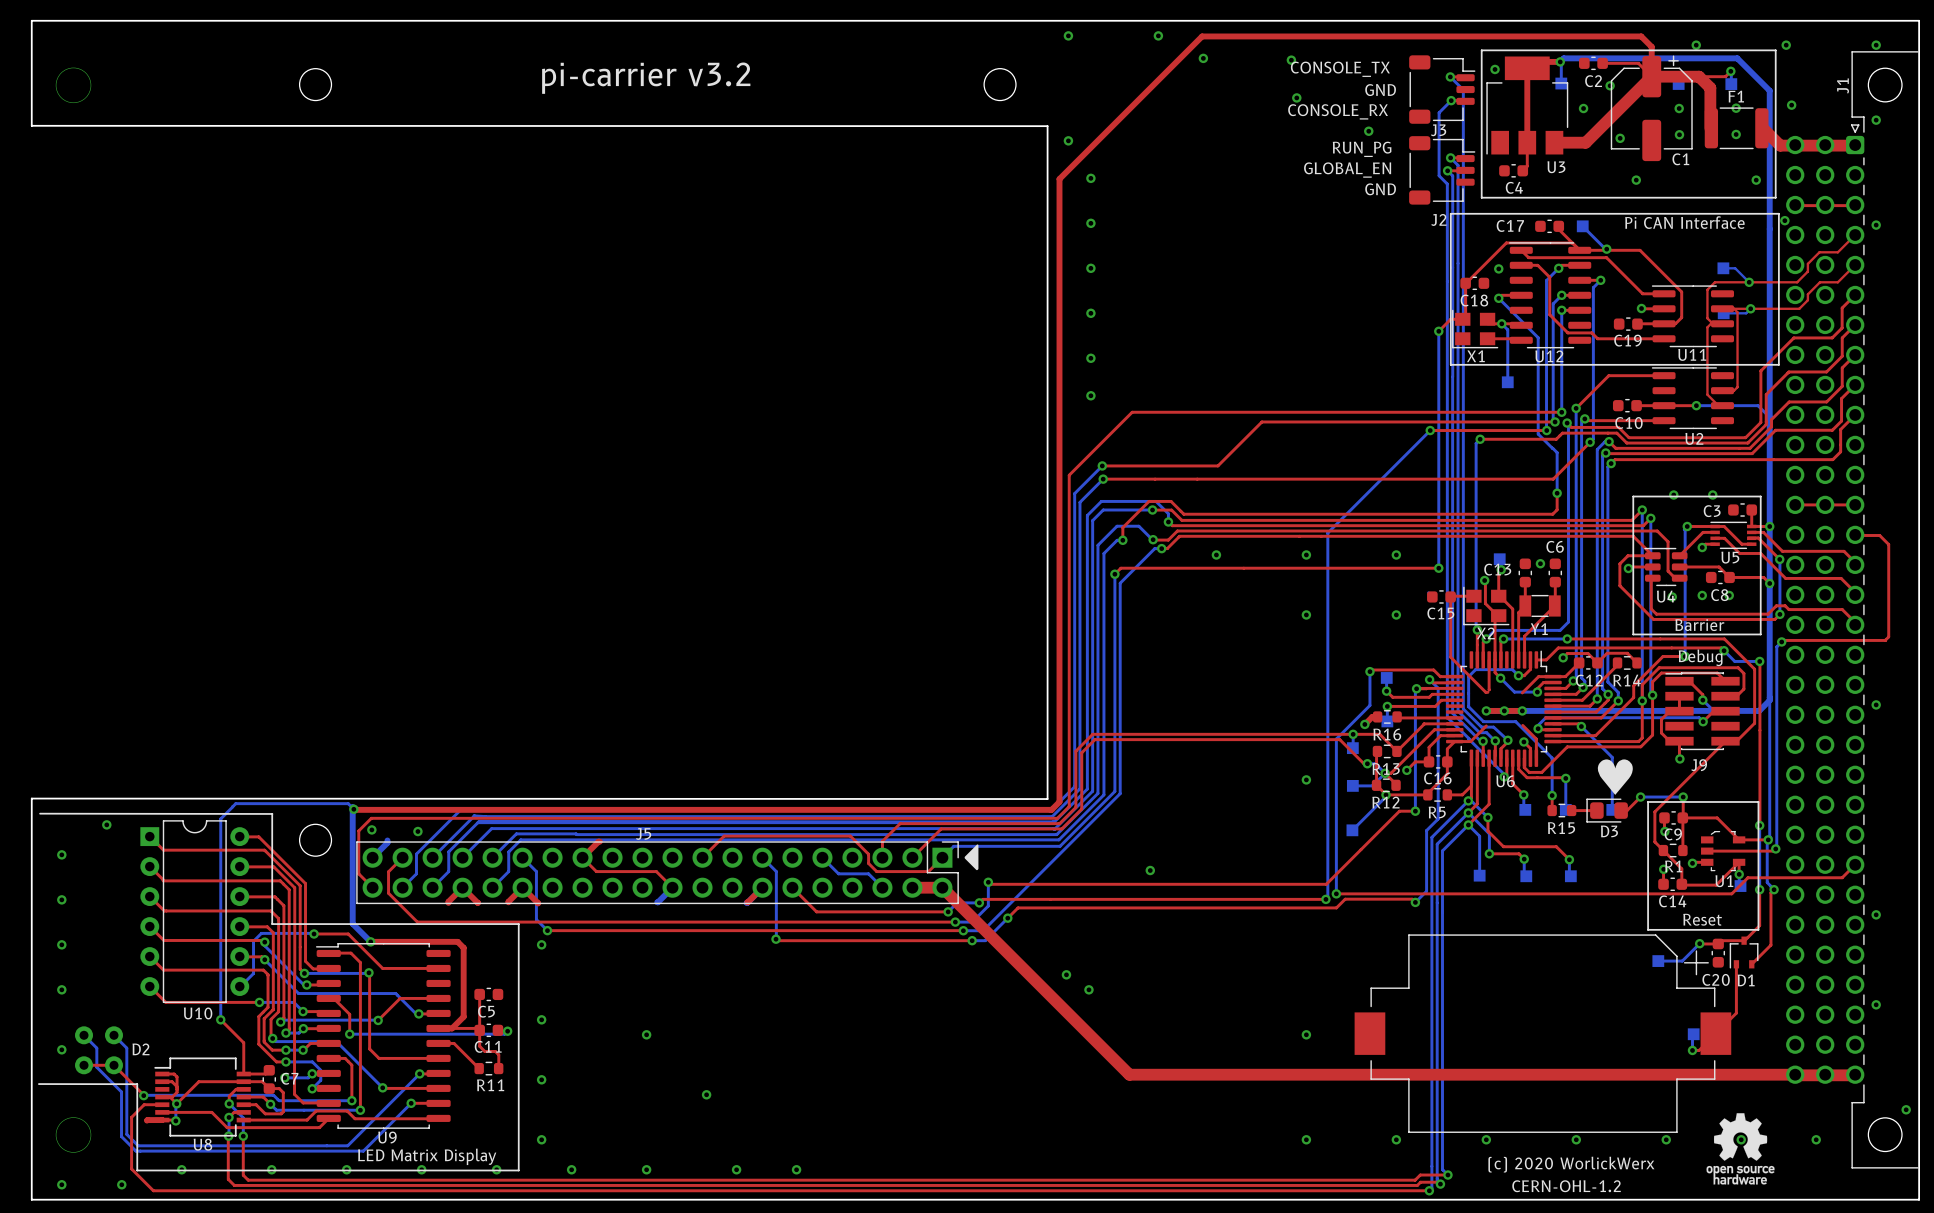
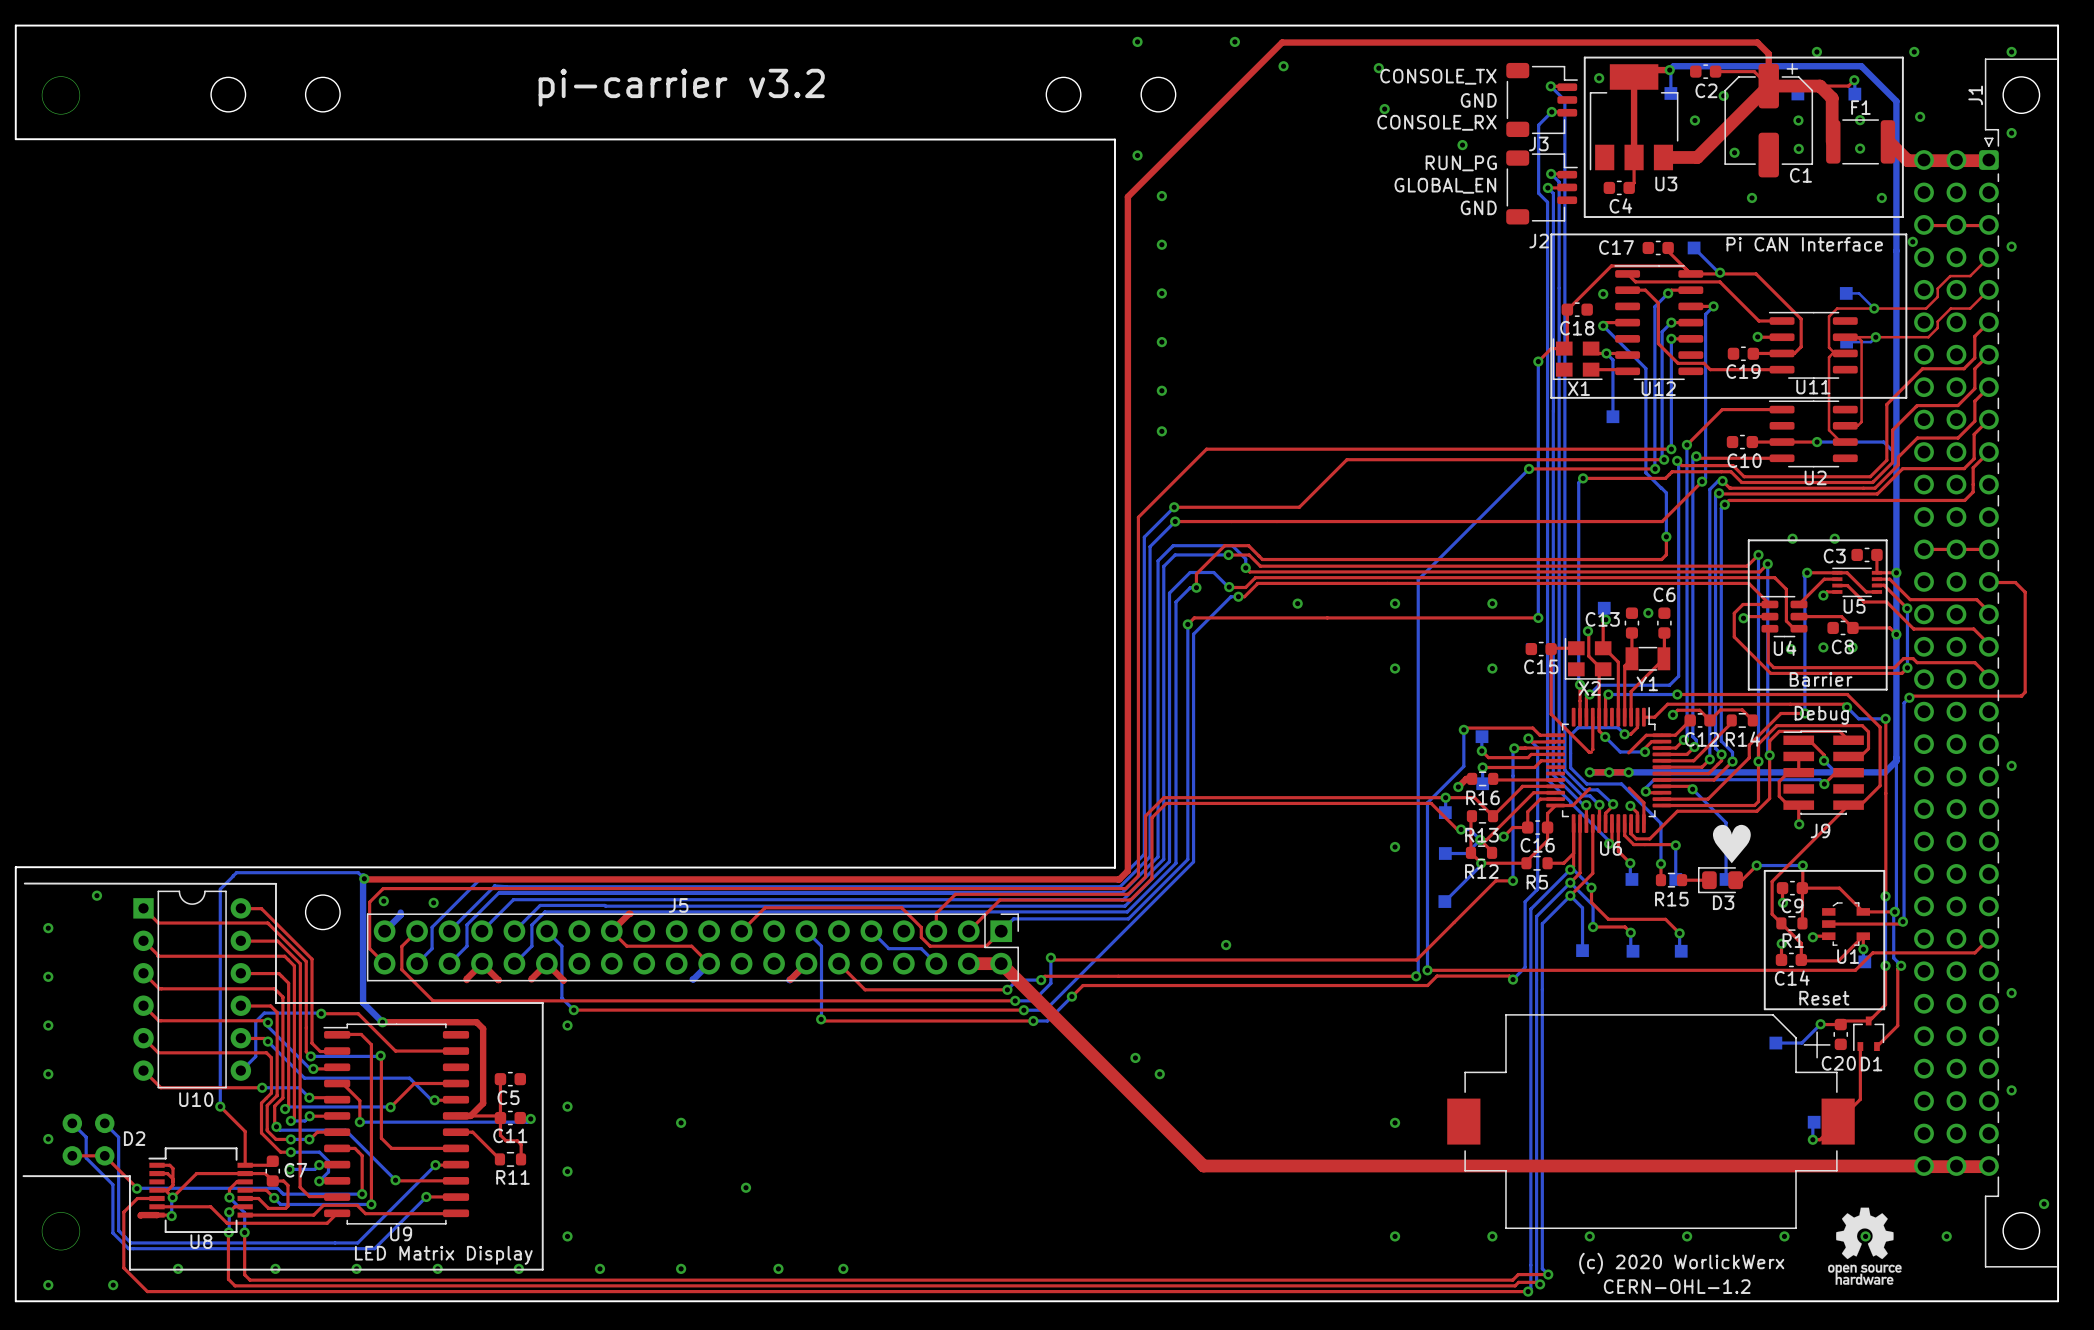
J5 footprint: [299, 68, 1016, 905] -> [211, 77, 1176, 982]
drawing: [964, 844, 979, 871] -> none

